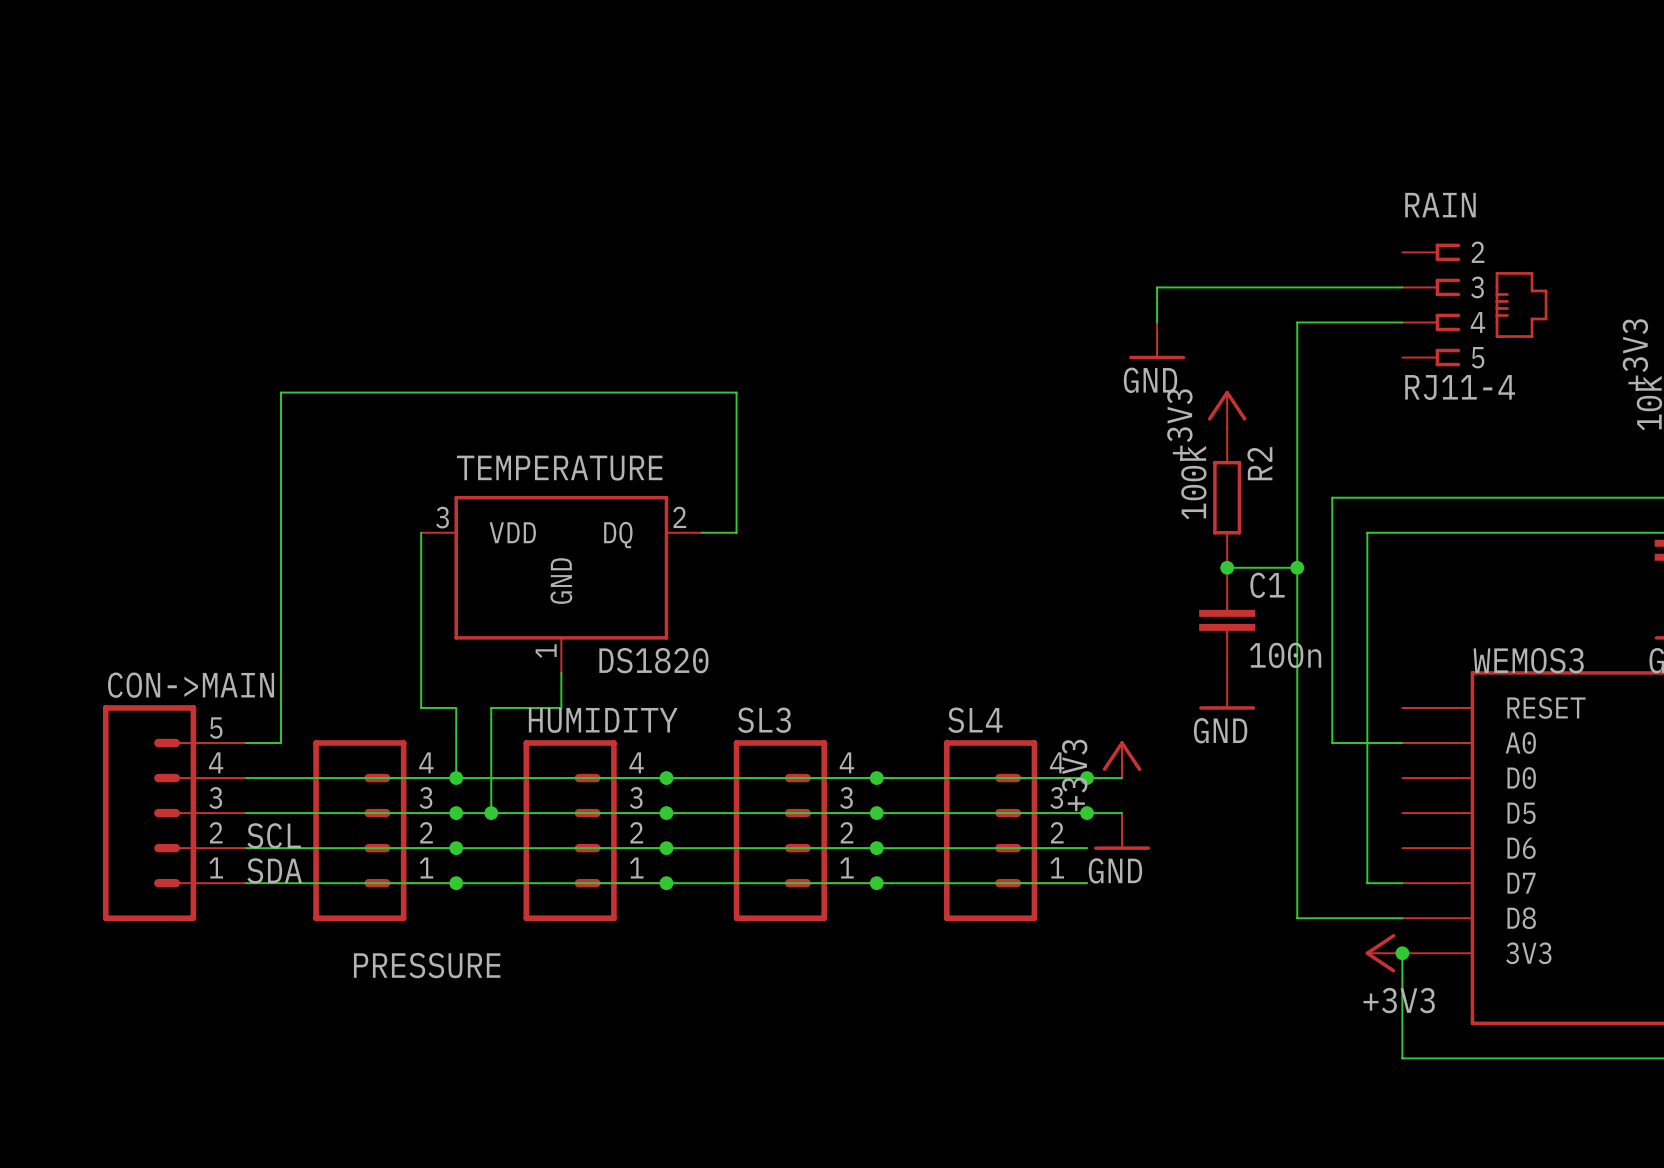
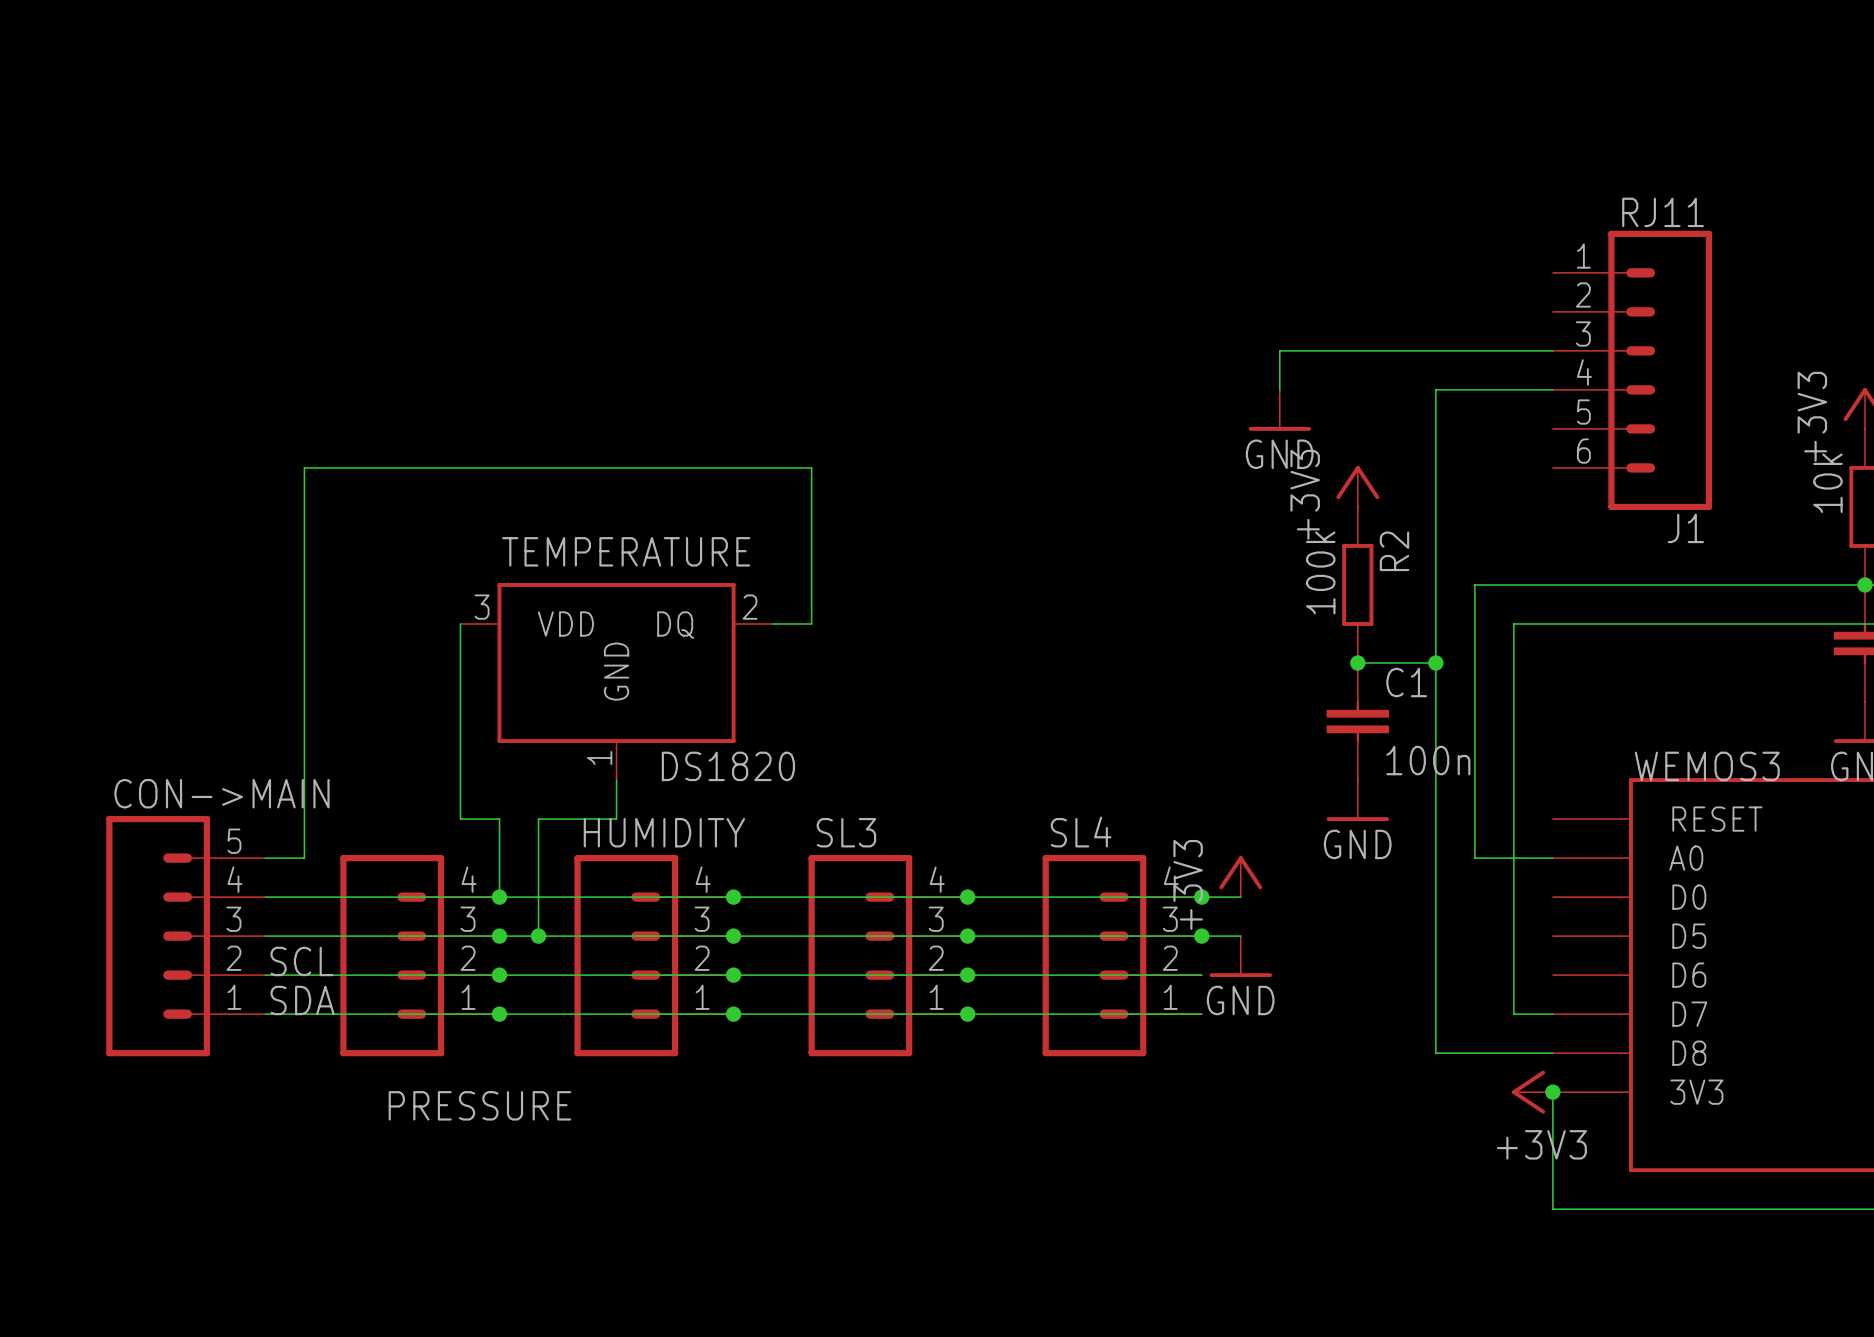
J1: none -> RJ11 (1632, 370)
RAIN: RJ11-4 (1474, 304) -> none

